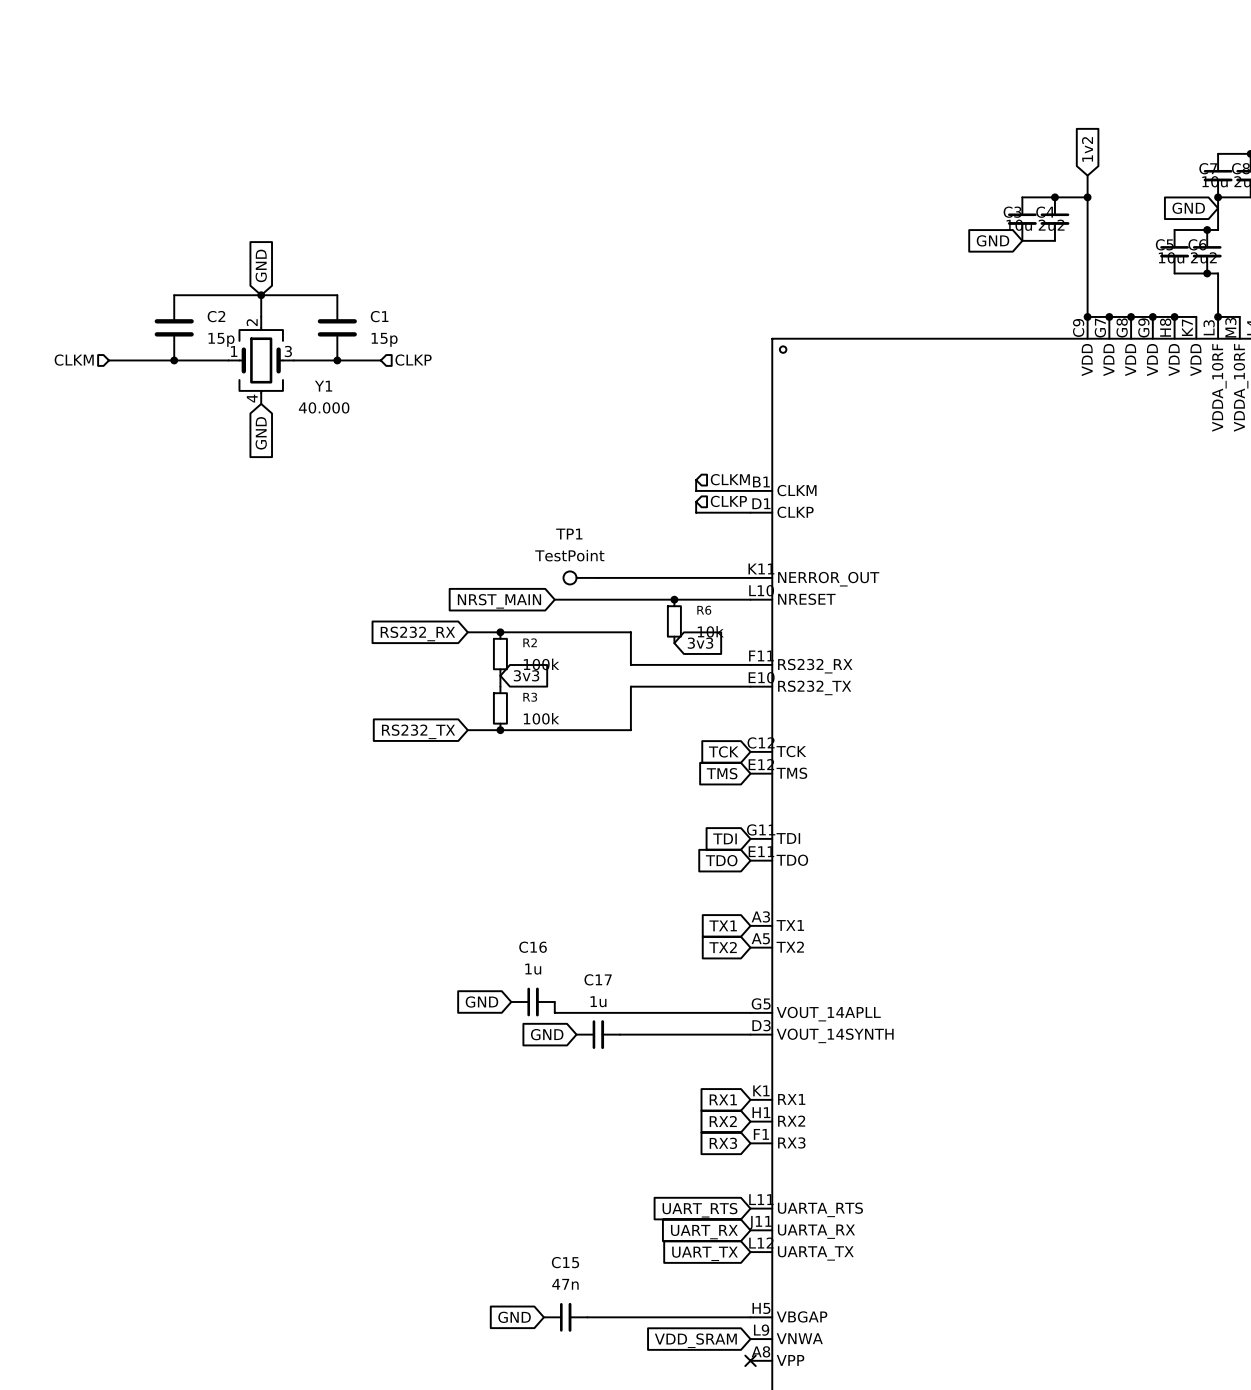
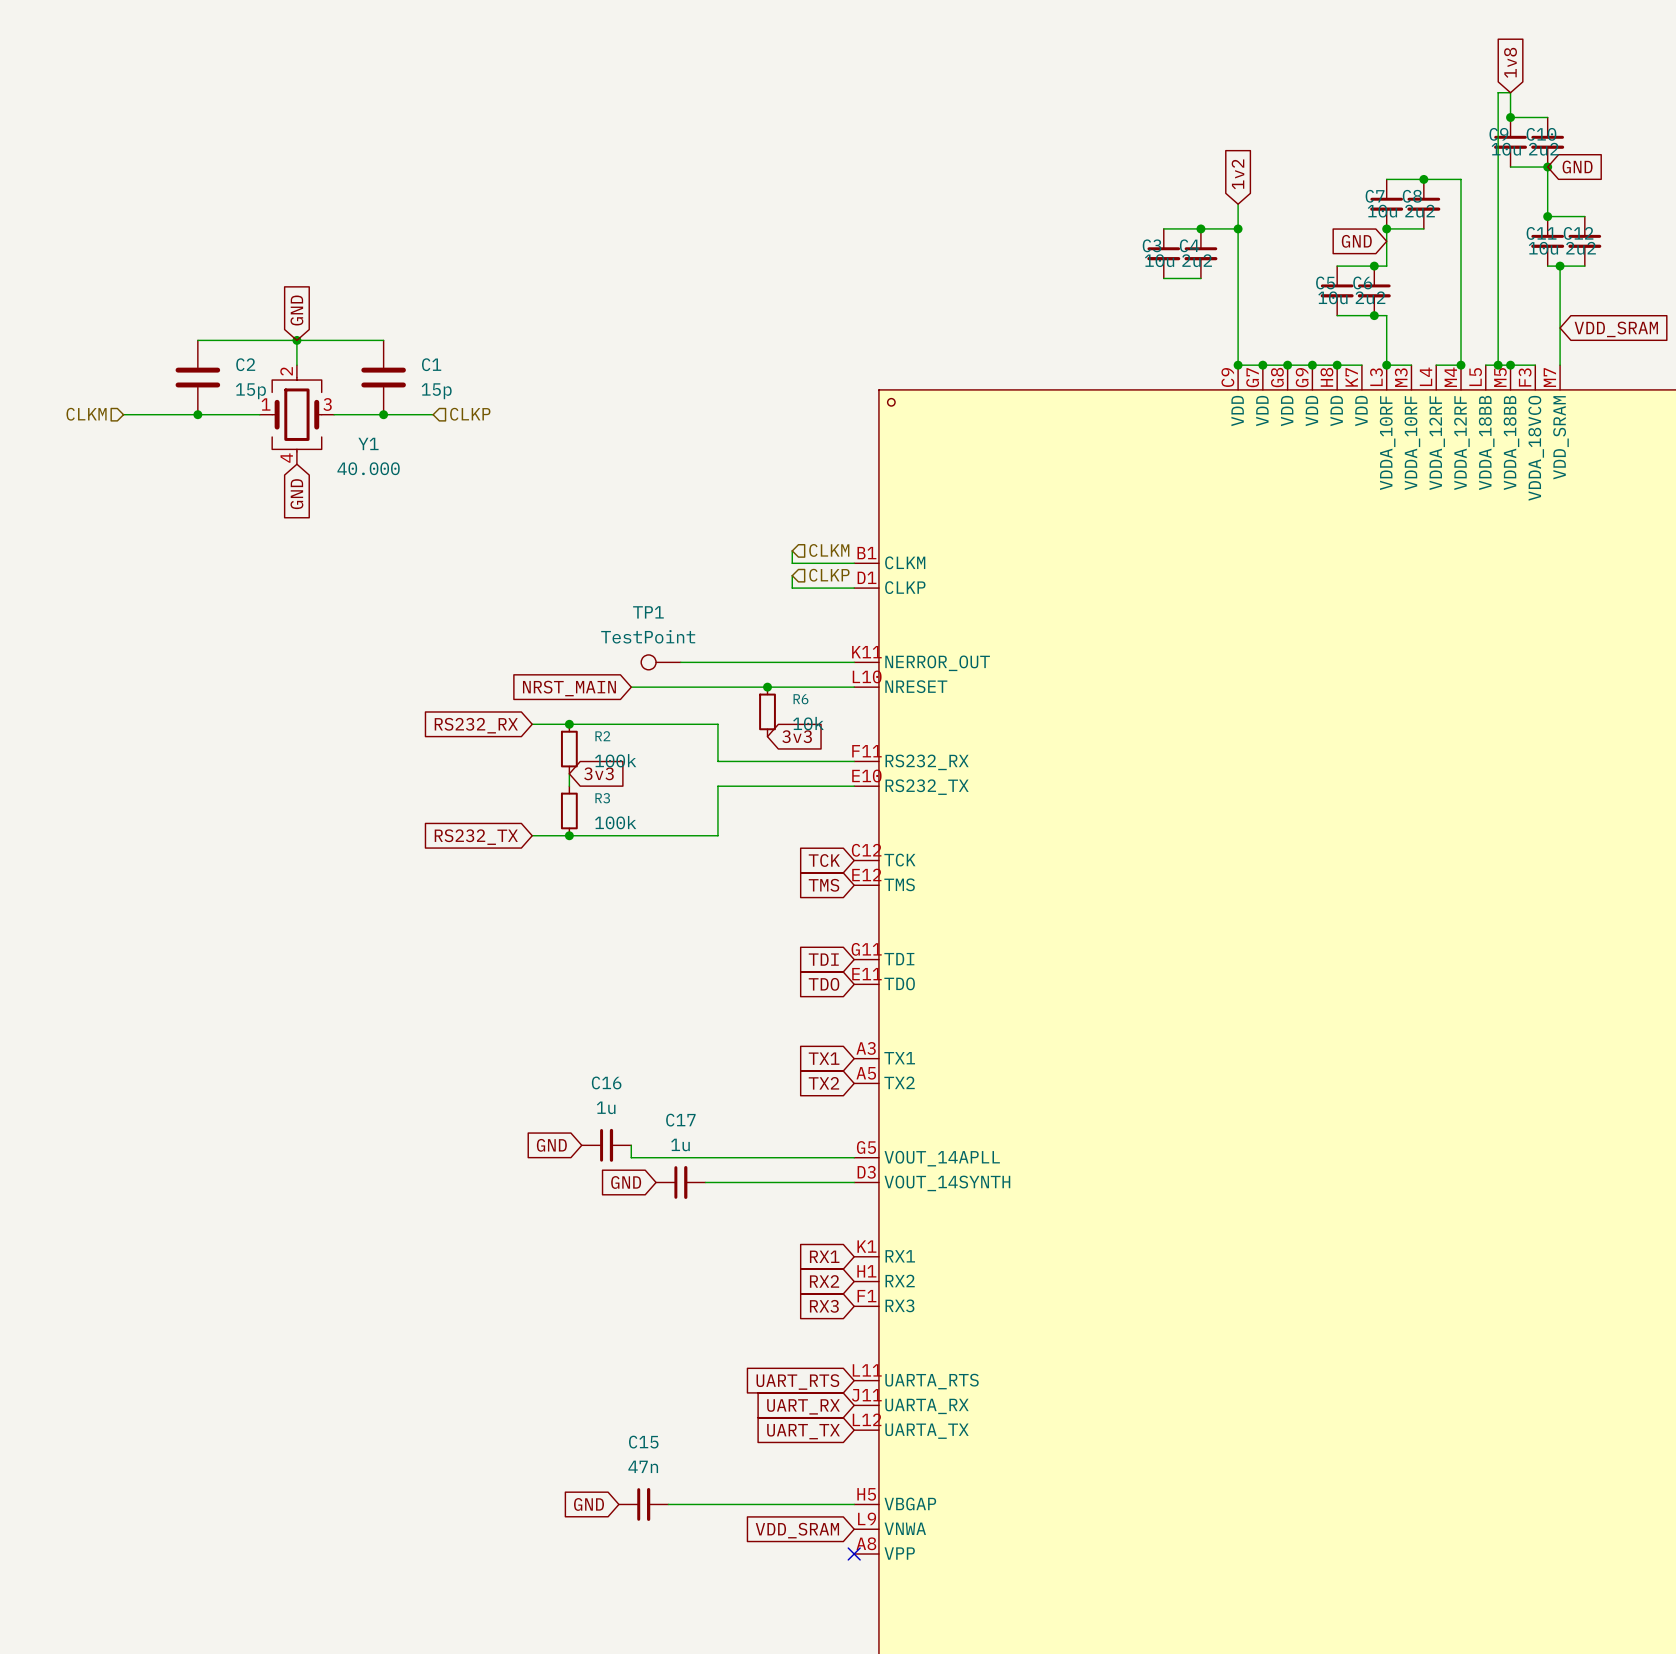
global label: GND (993, 240) -> none

